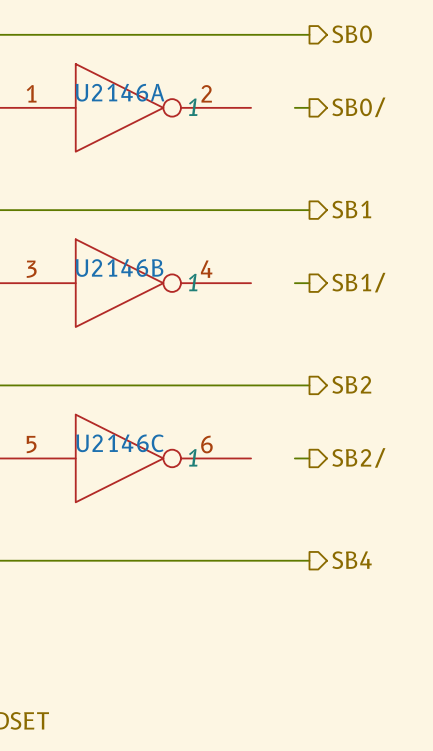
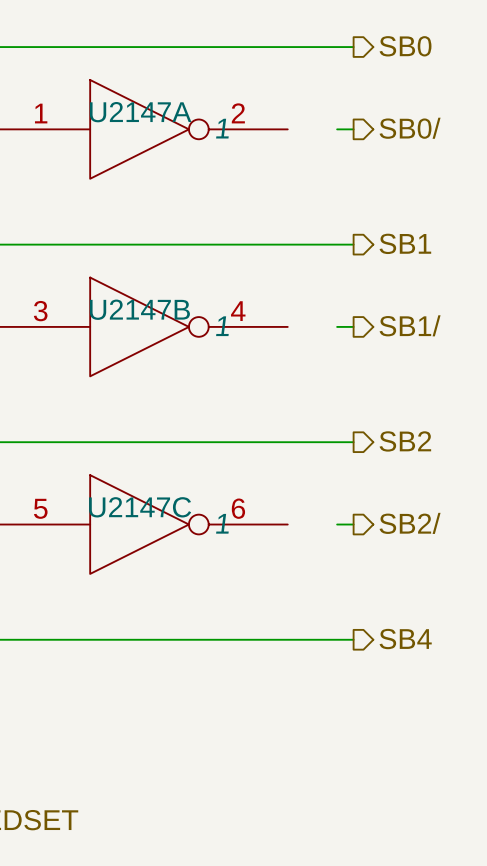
U2146A name: U2146A (120, 92) -> U2147A (140, 112)
U2146B name: U2146B (119, 268) -> U2147B (139, 309)
U2146C name: U2146C (119, 443) -> U2147C (140, 507)

